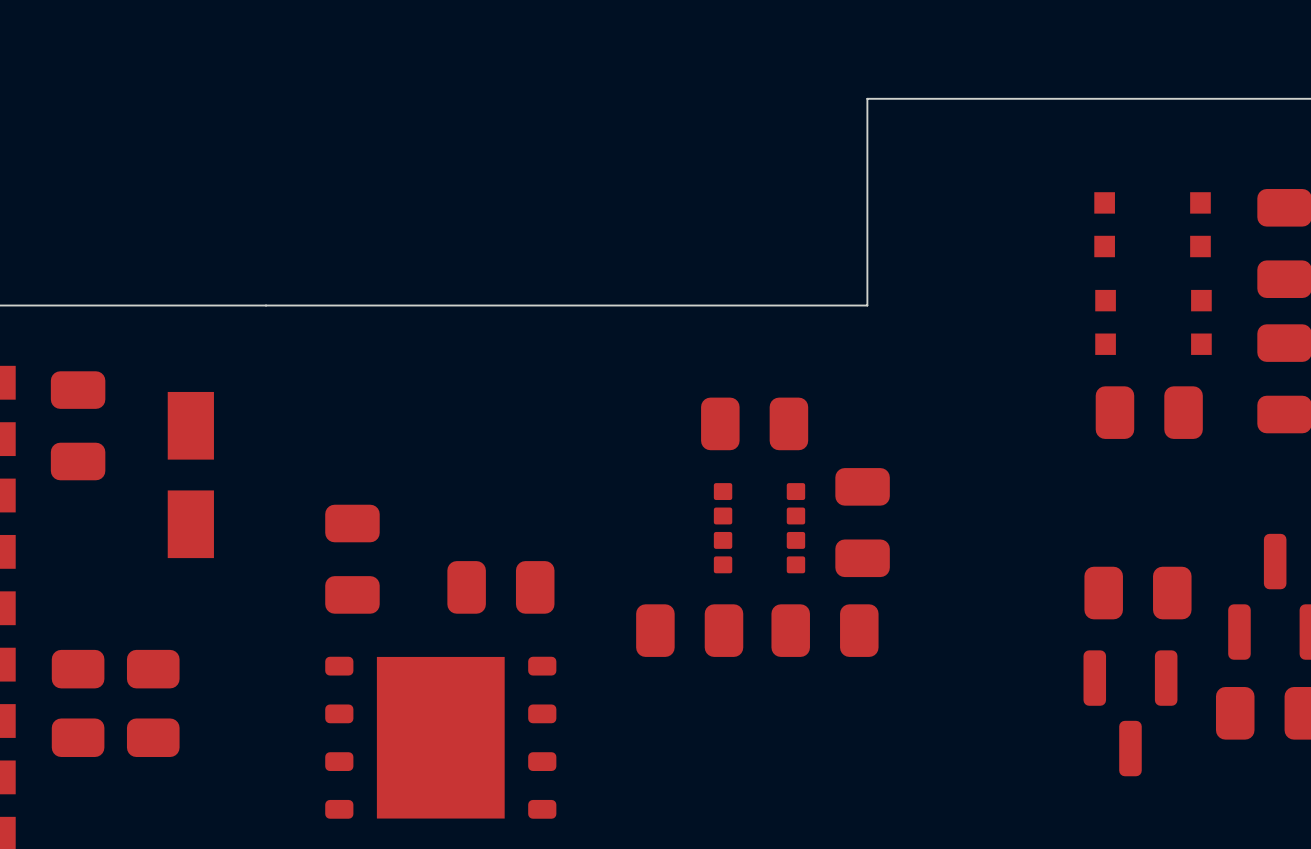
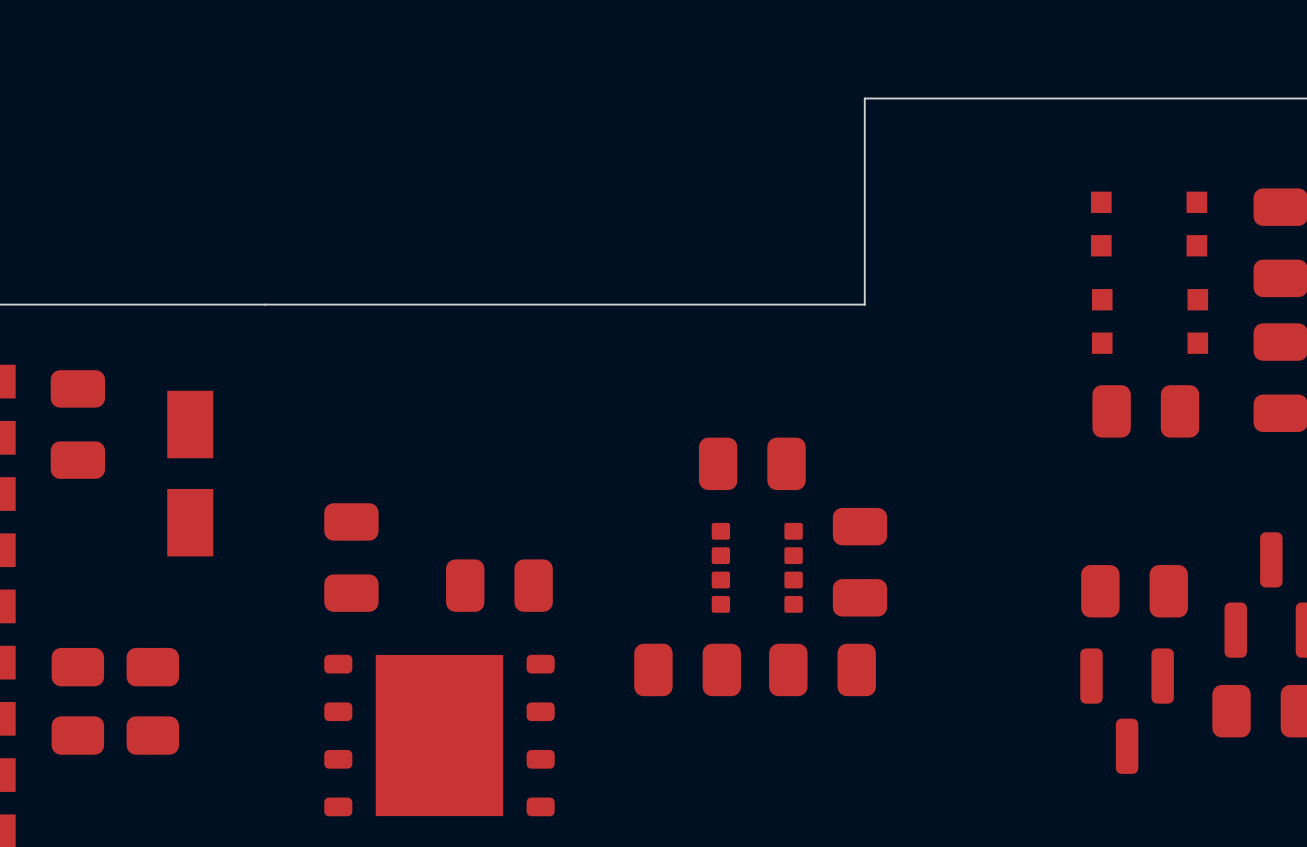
part position: (754, 423) -> (752, 463)
part position: (862, 522) -> (859, 562)
part position: (759, 528) -> (757, 567)
part position: (689, 630) -> (687, 669)
part position: (825, 630) -> (822, 669)

